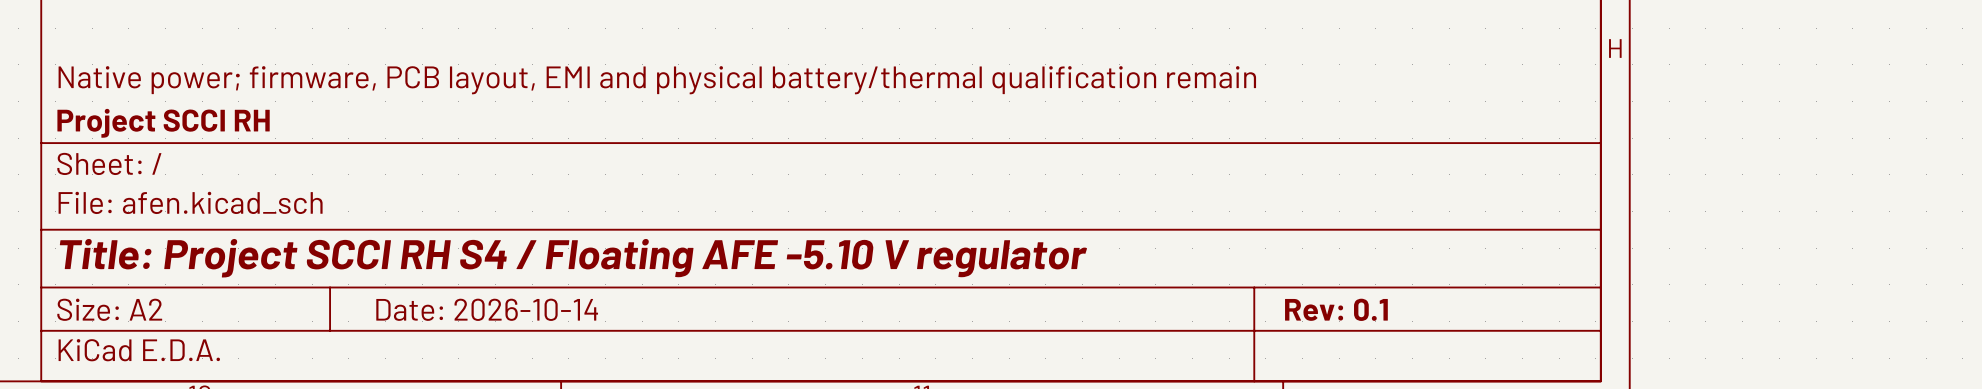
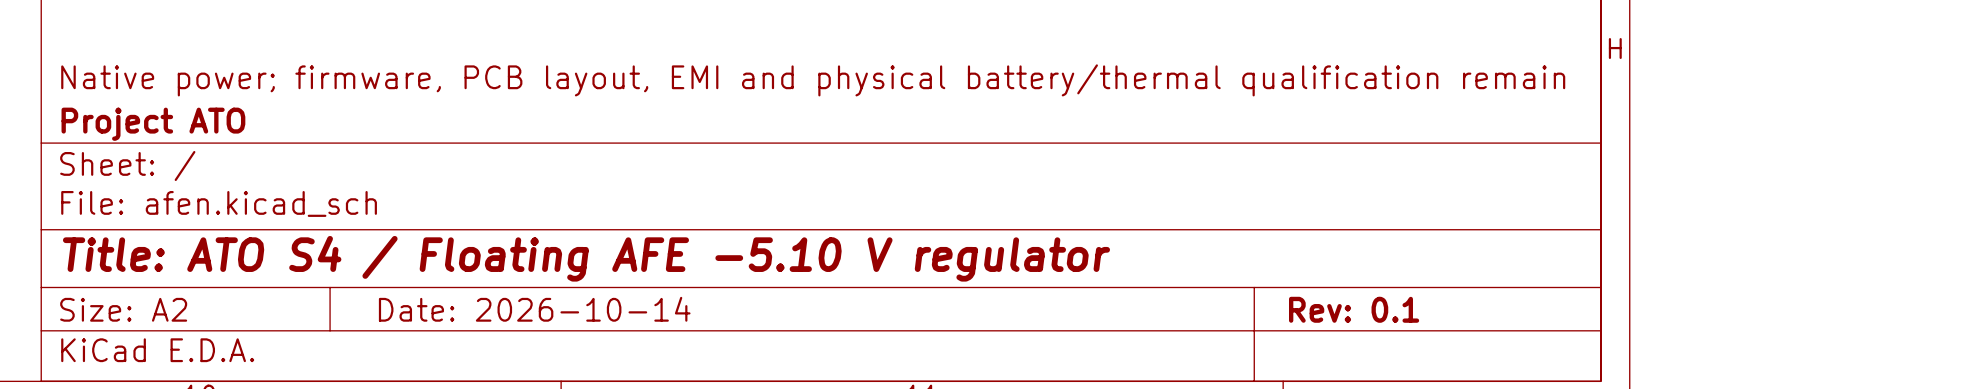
title block: Project SCCI RH (163, 123) -> Project ATO (153, 124)
title block: Title: Project SCCI RH S4 / Floating AFE -5.10 V regulator (573, 258) -> Title: ATO S4 / Floating AFE -5.10 V regulator (586, 258)

